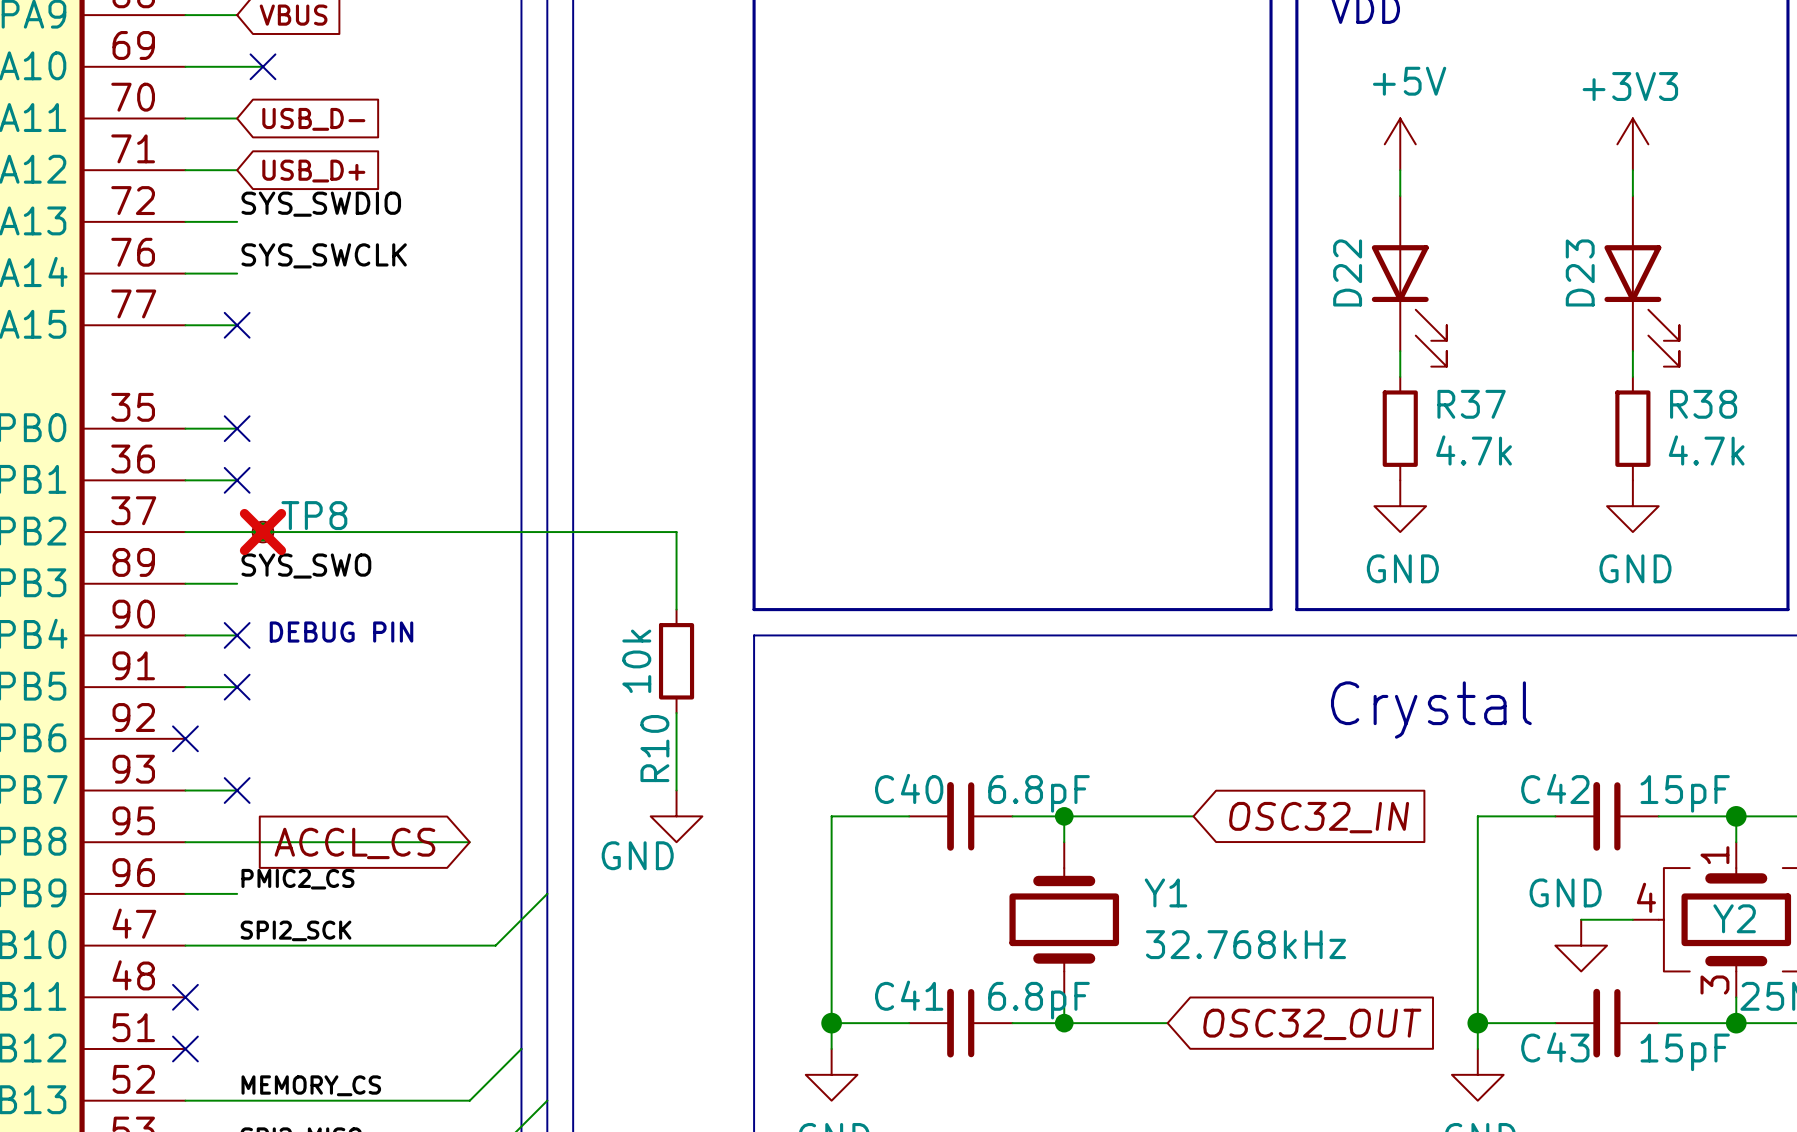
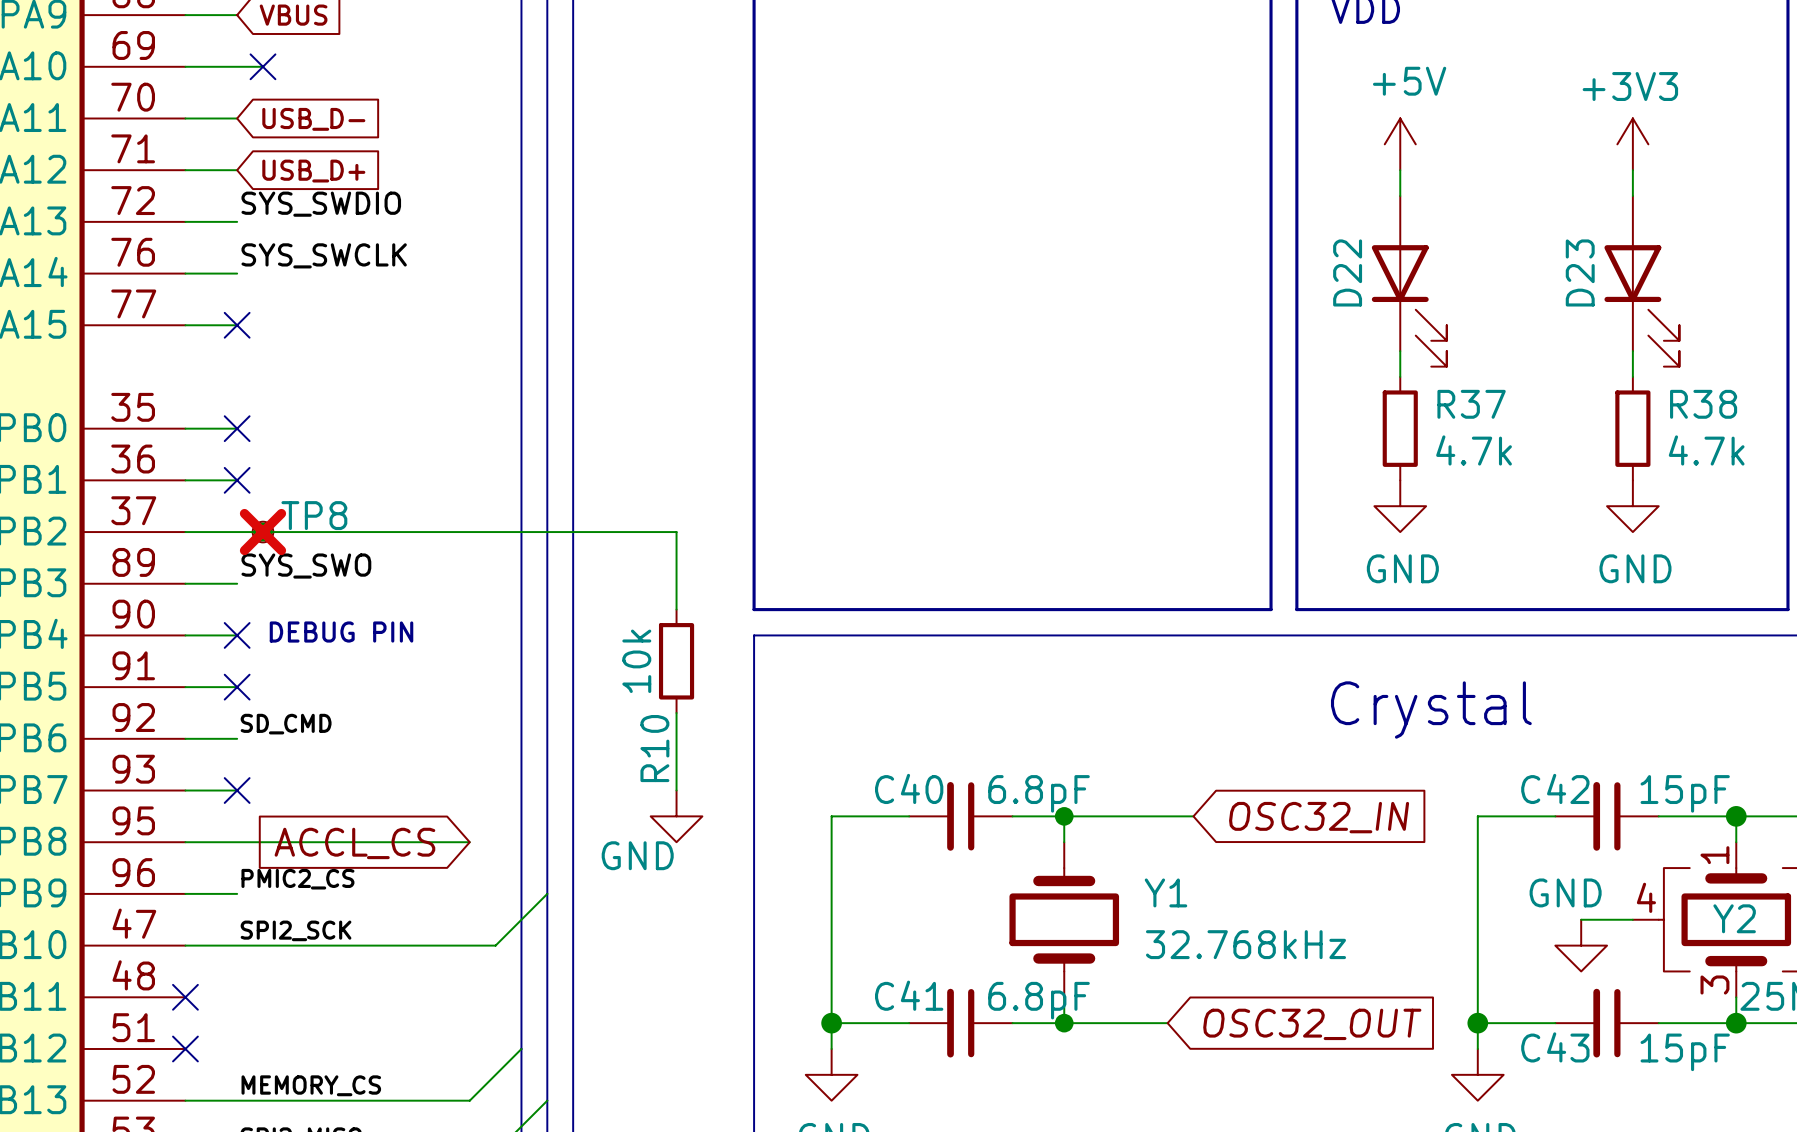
label: none -> SD_CMD (286, 724)
wire: none -> (185, 738) (237, 738)
no-connect mark: (185, 738) -> none

